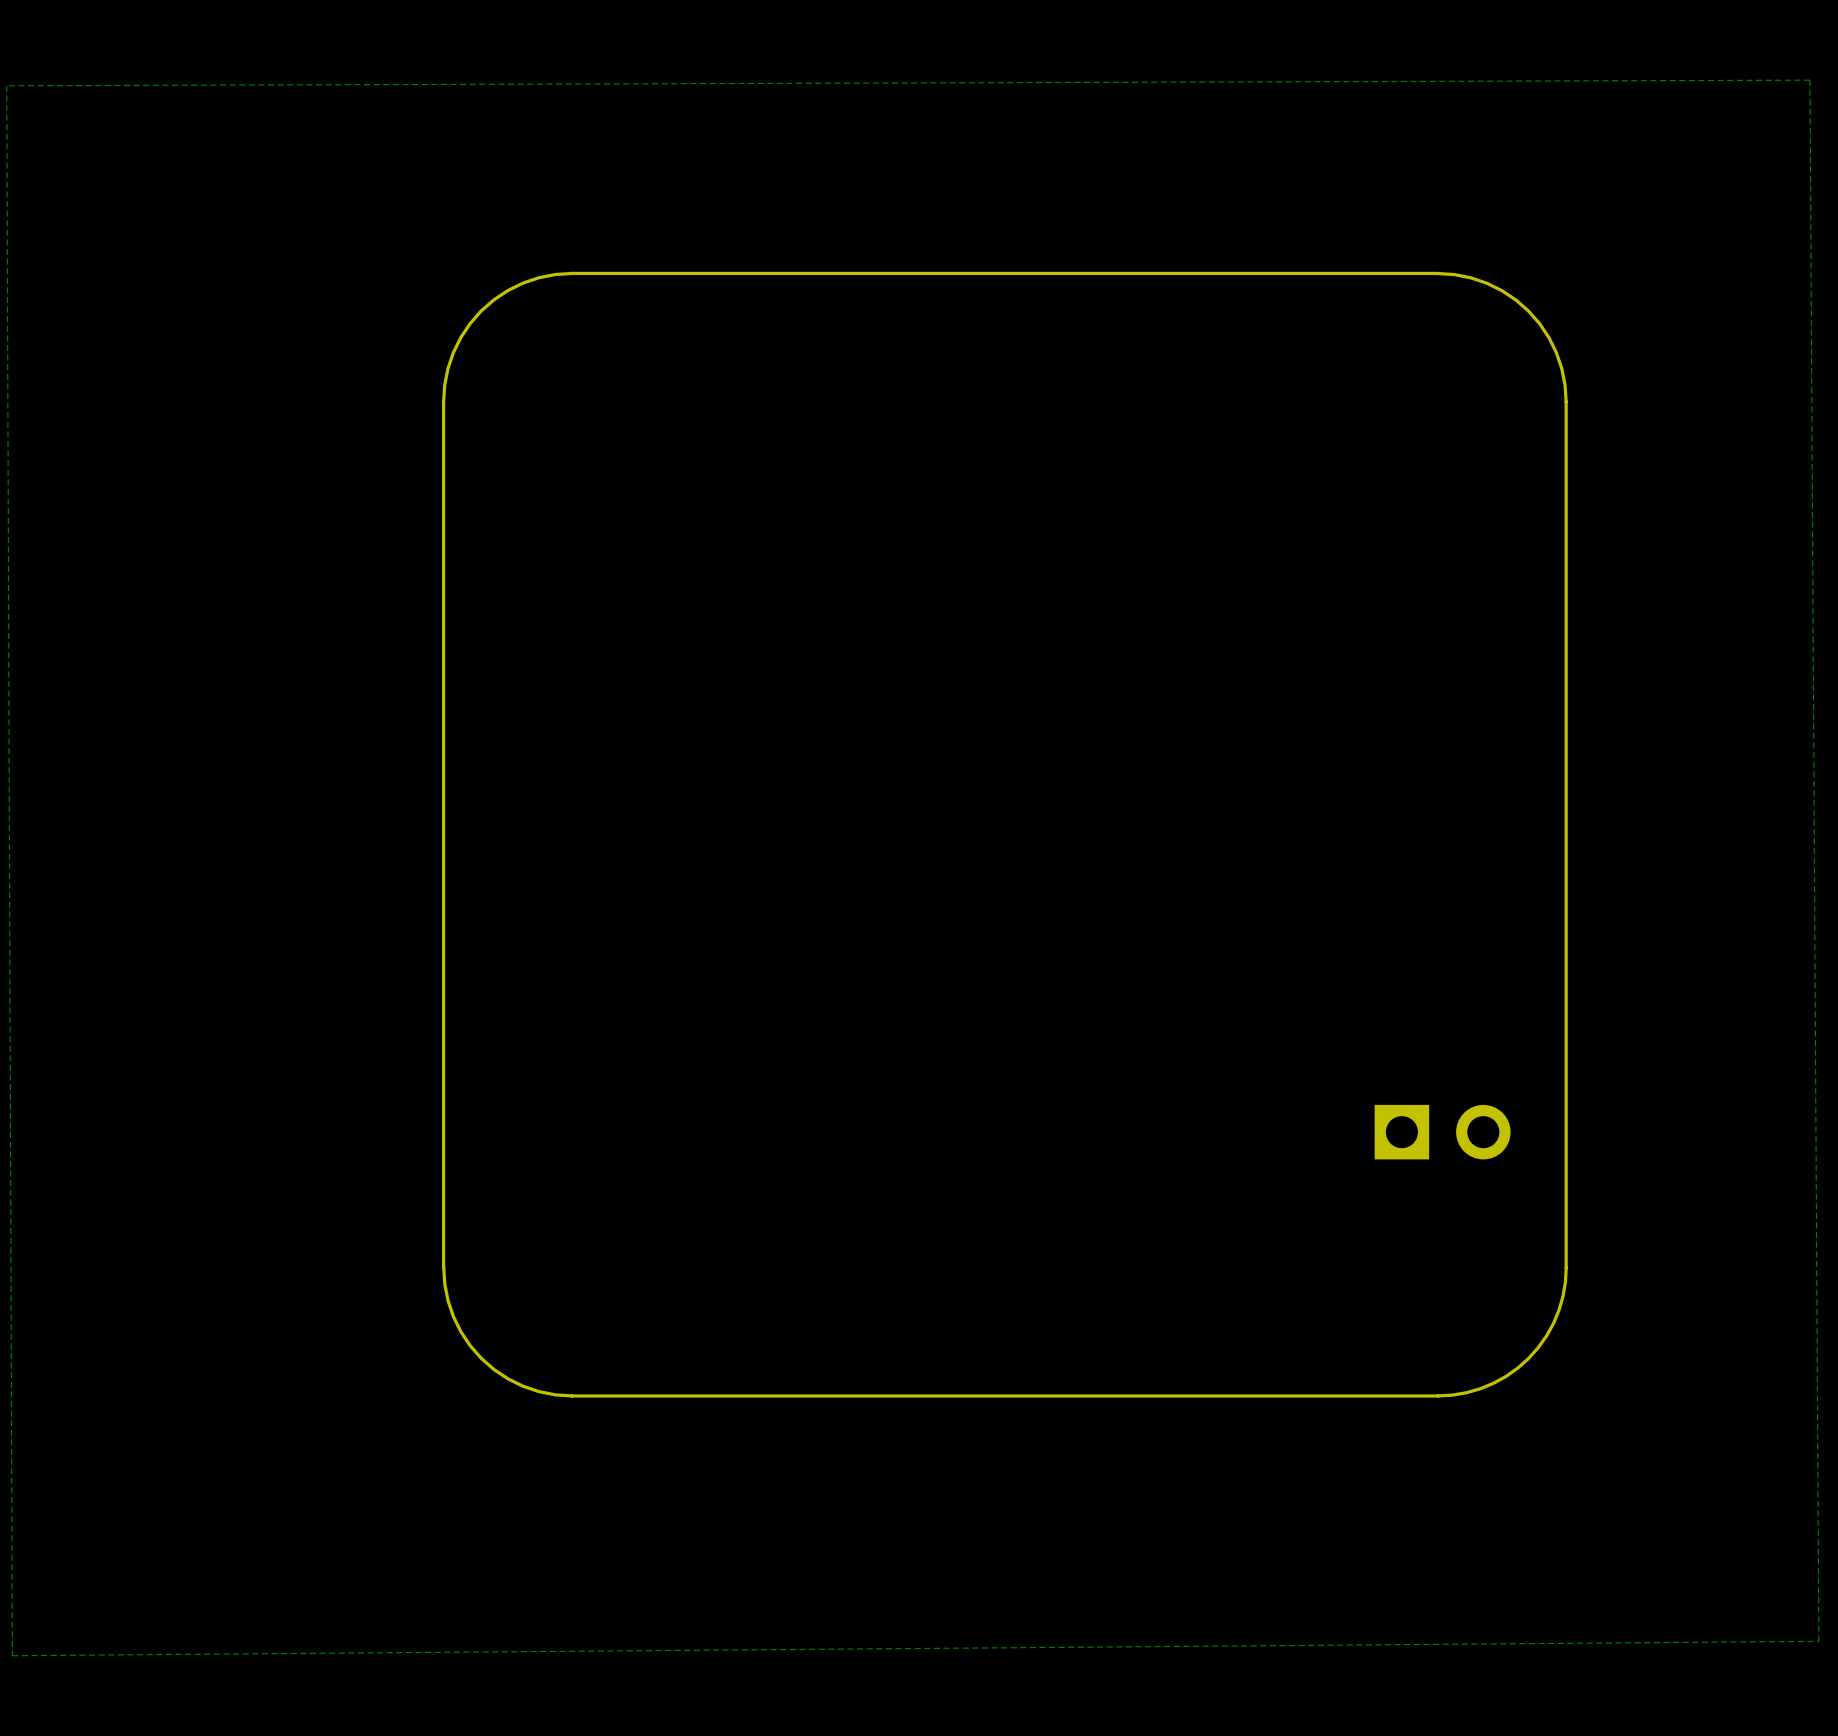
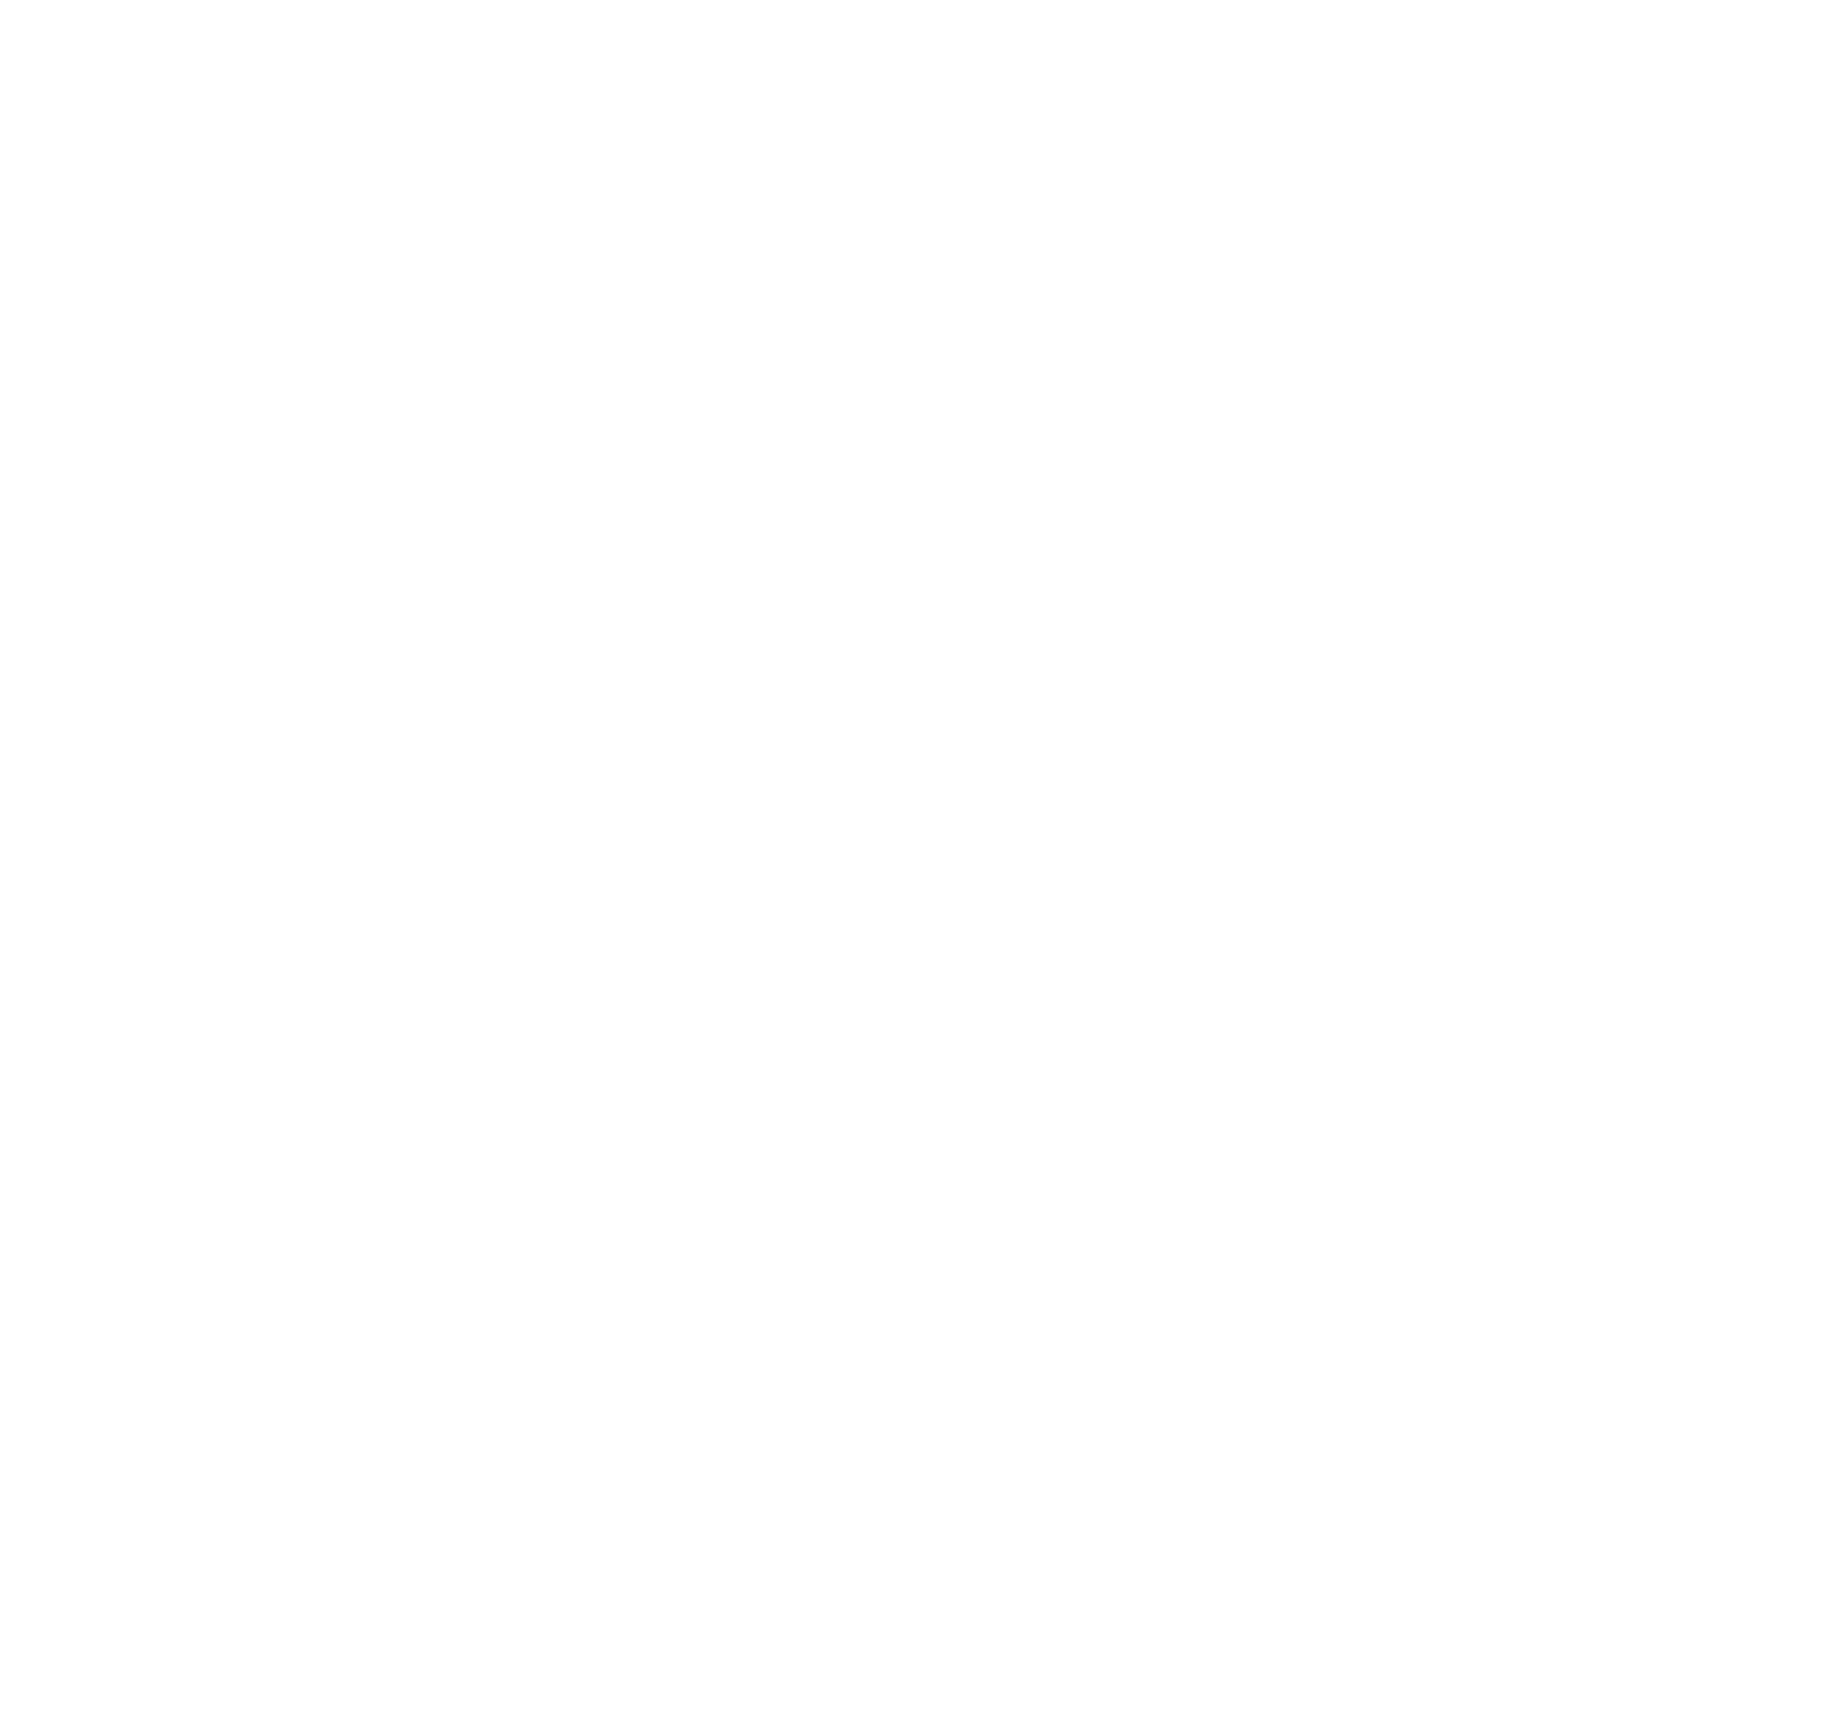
zone outline: (1810, 80) (6, 85) (12, 1655) (1818, 1641) (1810, 80) -> none
part: (1442, 1132) -> none
board edge: (1566, 1267) (1565, 1282) (1559, 1310) (1546, 1335) (1528, 1358) (1506, 1376) (1480, 1388) (1466, 1392) (1437, 1395) -> none
board edge: (1566, 1267) (1566, 401) (1561, 368) (1556, 352) (1548, 337) (1528, 311) (1502, 290) (1486, 283) (1454, 274) (1437, 273) (571, 273) (555, 274) (522, 283) (507, 290) (481, 311) (470, 323) (453, 352) (447, 368) (443, 401) (443, 1267) (448, 1300) (453, 1316) (470, 1345) (481, 1358) (507, 1378) (522, 1386) (538, 1391) (572, 1395) (1437, 1395) -> none

